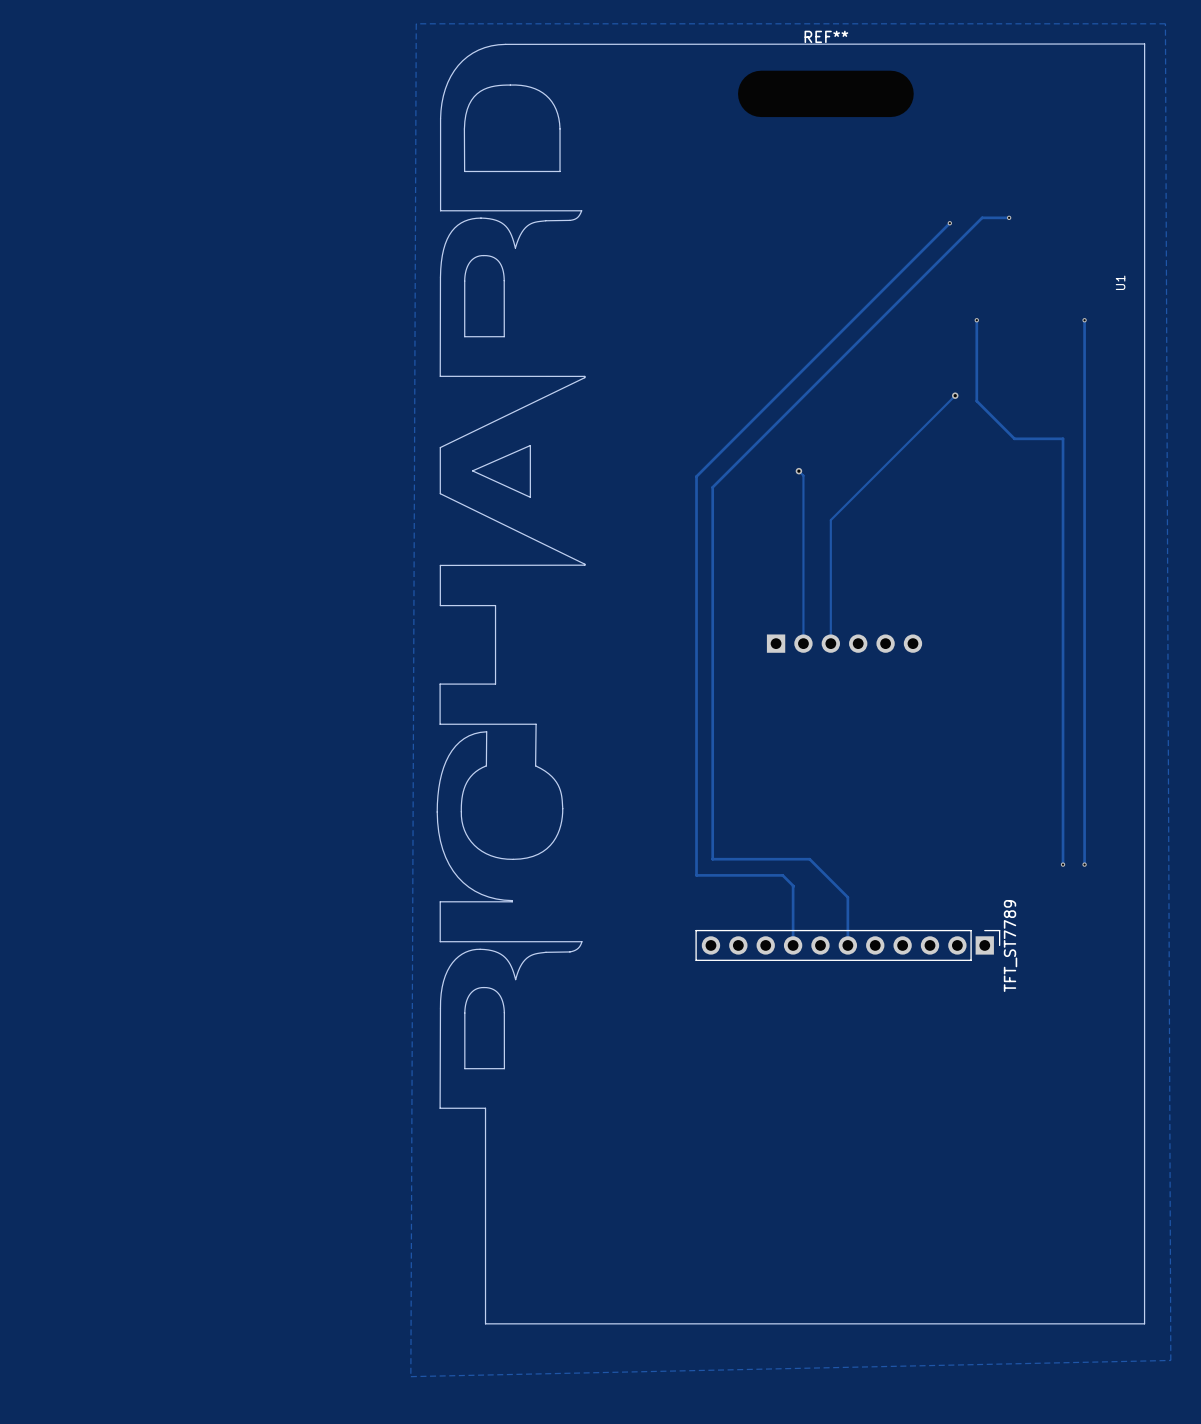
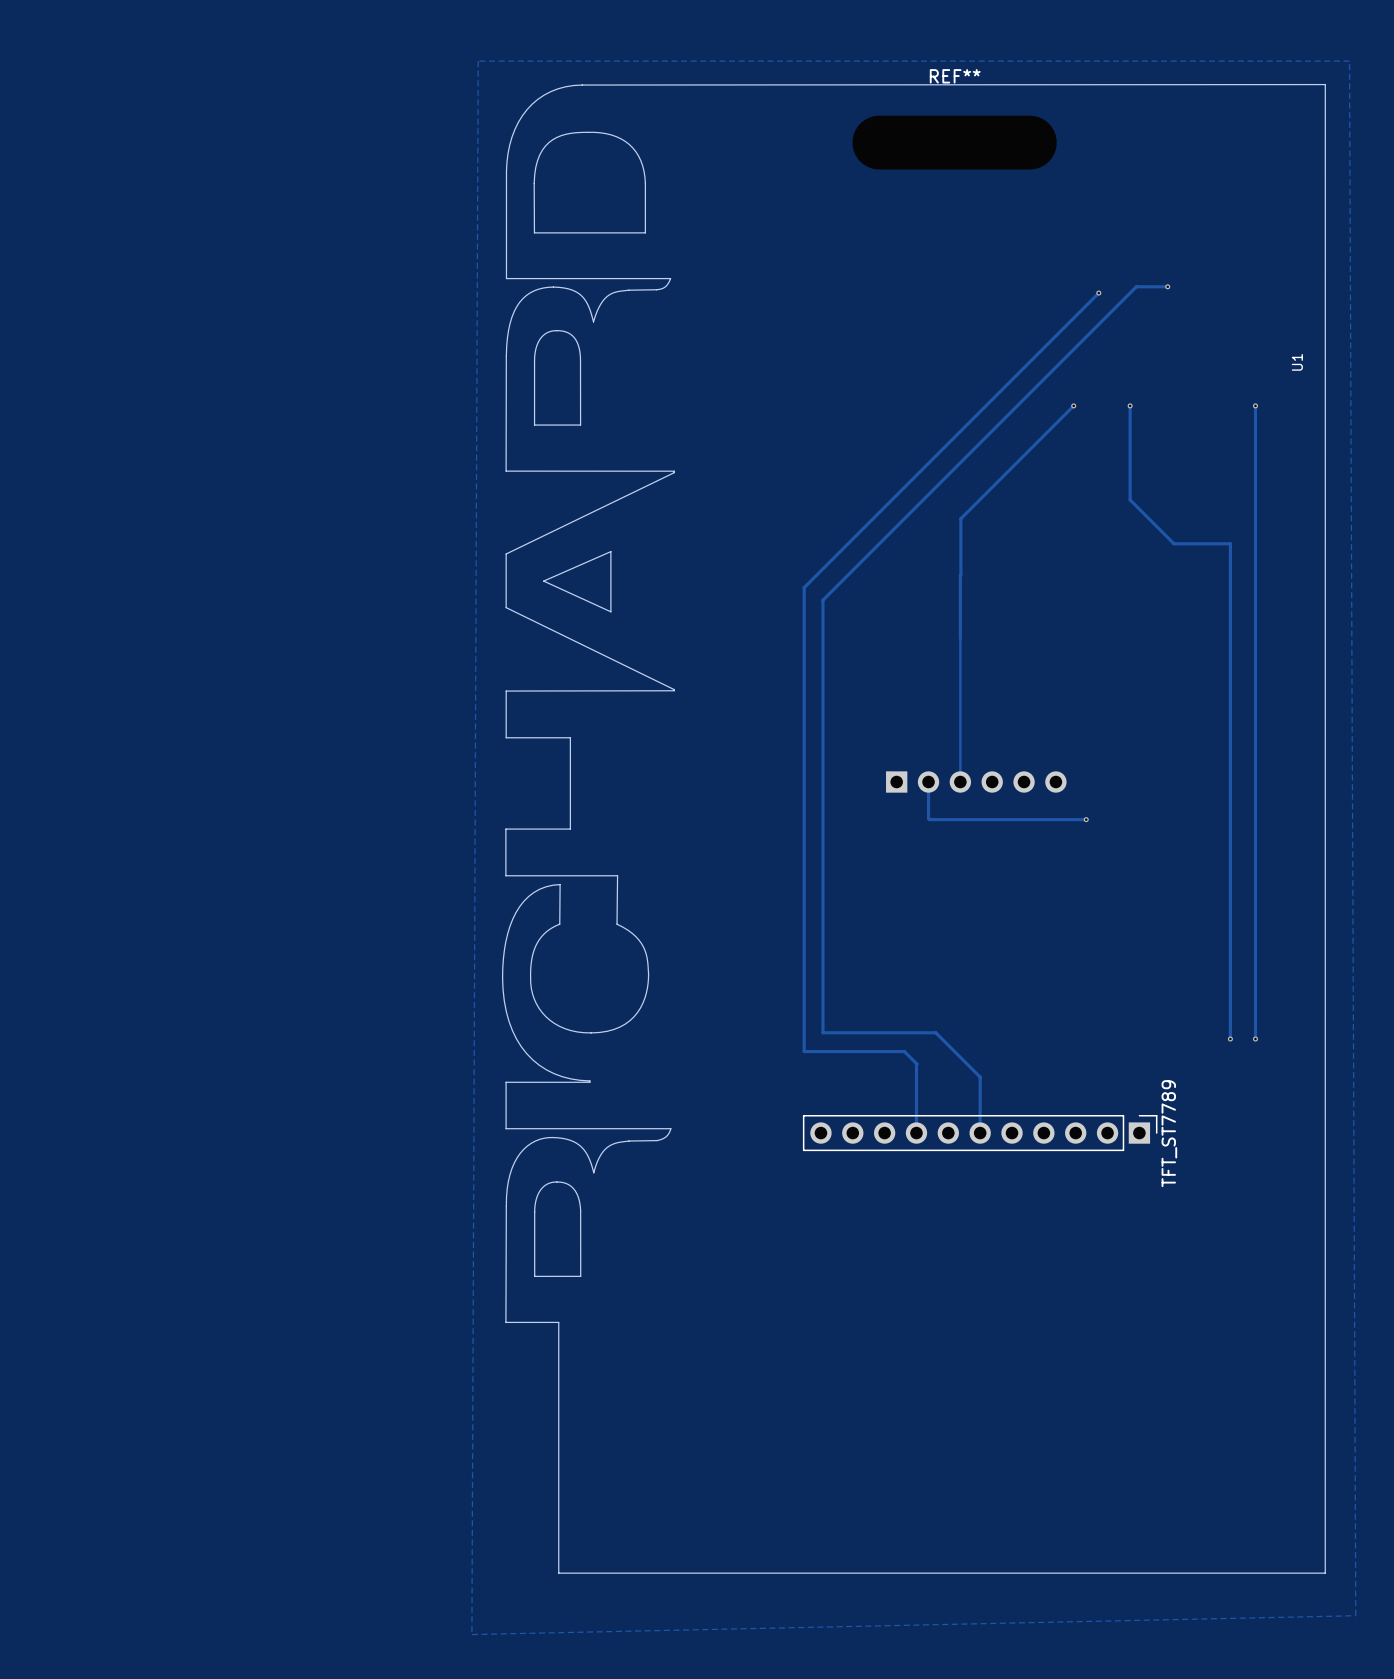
via: none -> (1073, 405)
track: (955, 395) (830, 520) -> (1073, 405) (960, 518) (960, 638)
via: (955, 395) -> none
track: (798, 471) (803, 475) (803, 643) -> (1086, 819) (929, 819) (928, 782)
via: (798, 471) -> none
via: none -> (1086, 819)

